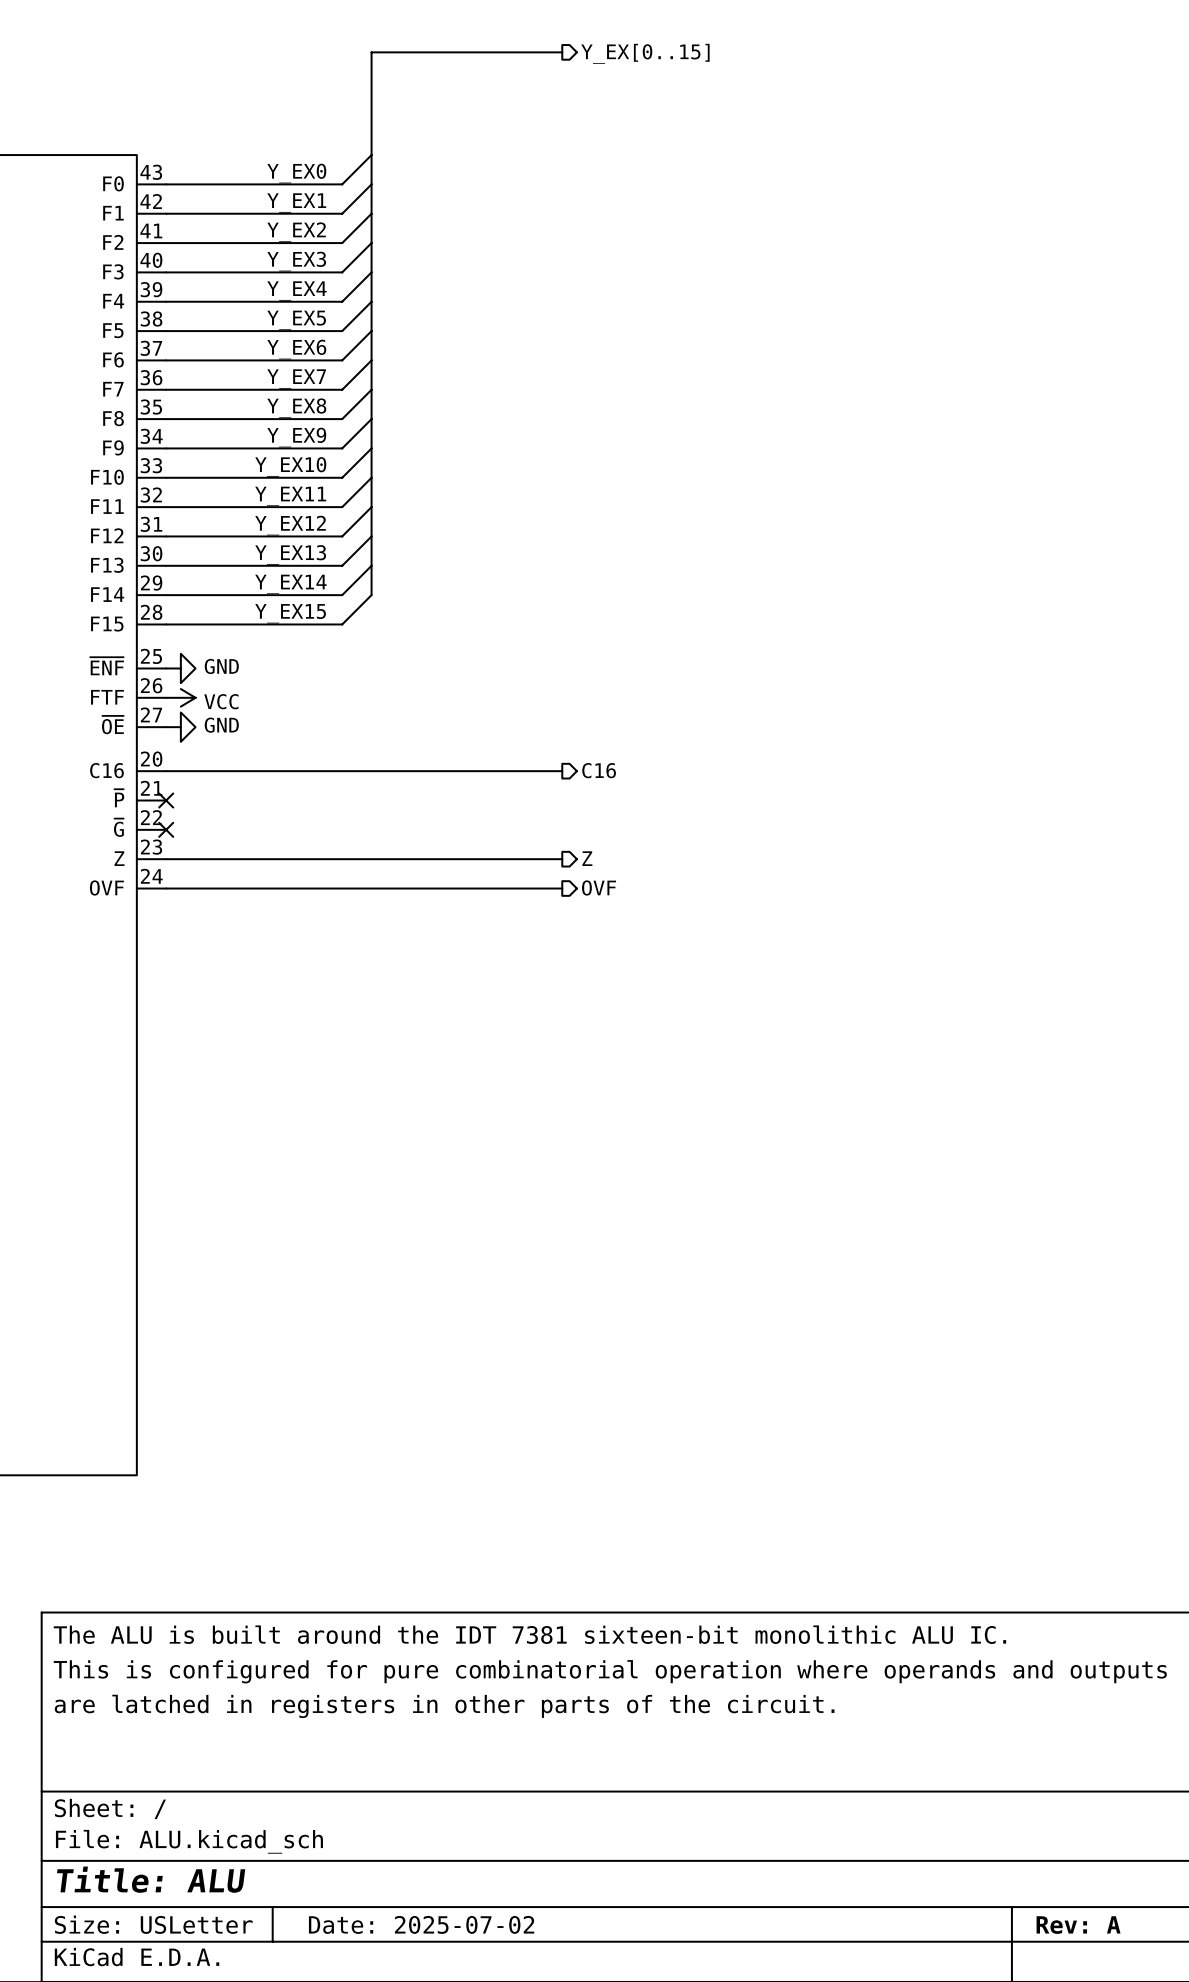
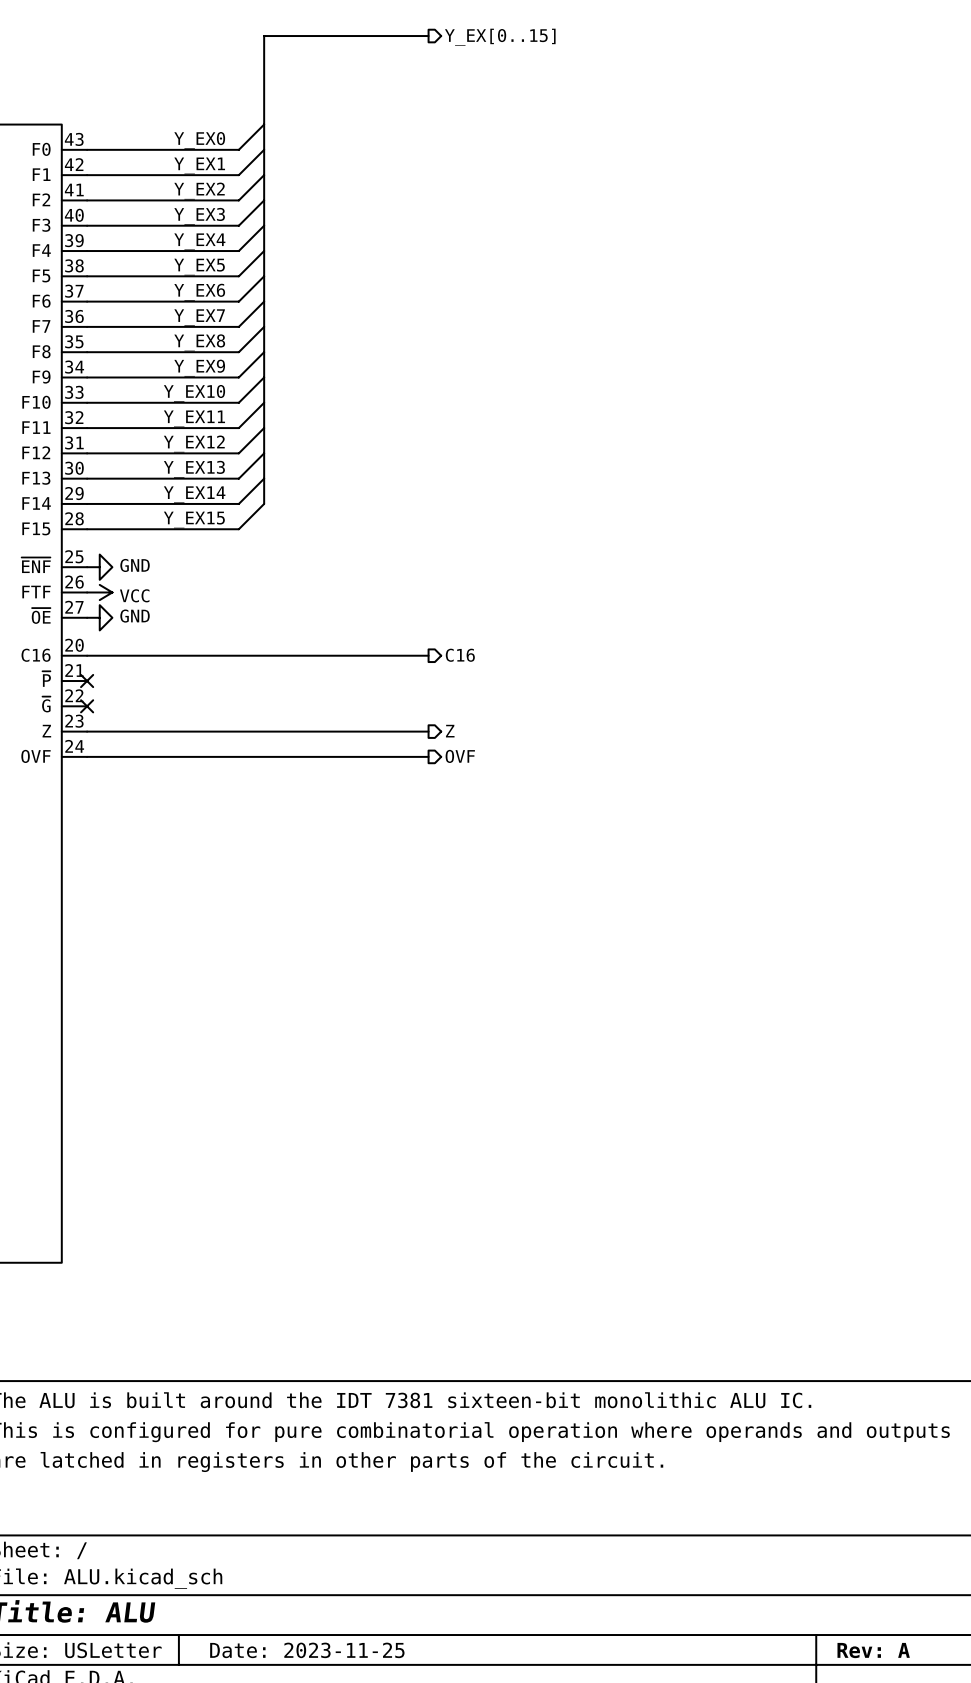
title block: Date: 2025-07-02 (421, 1924) -> Date: 2023-11-25 (307, 1650)

